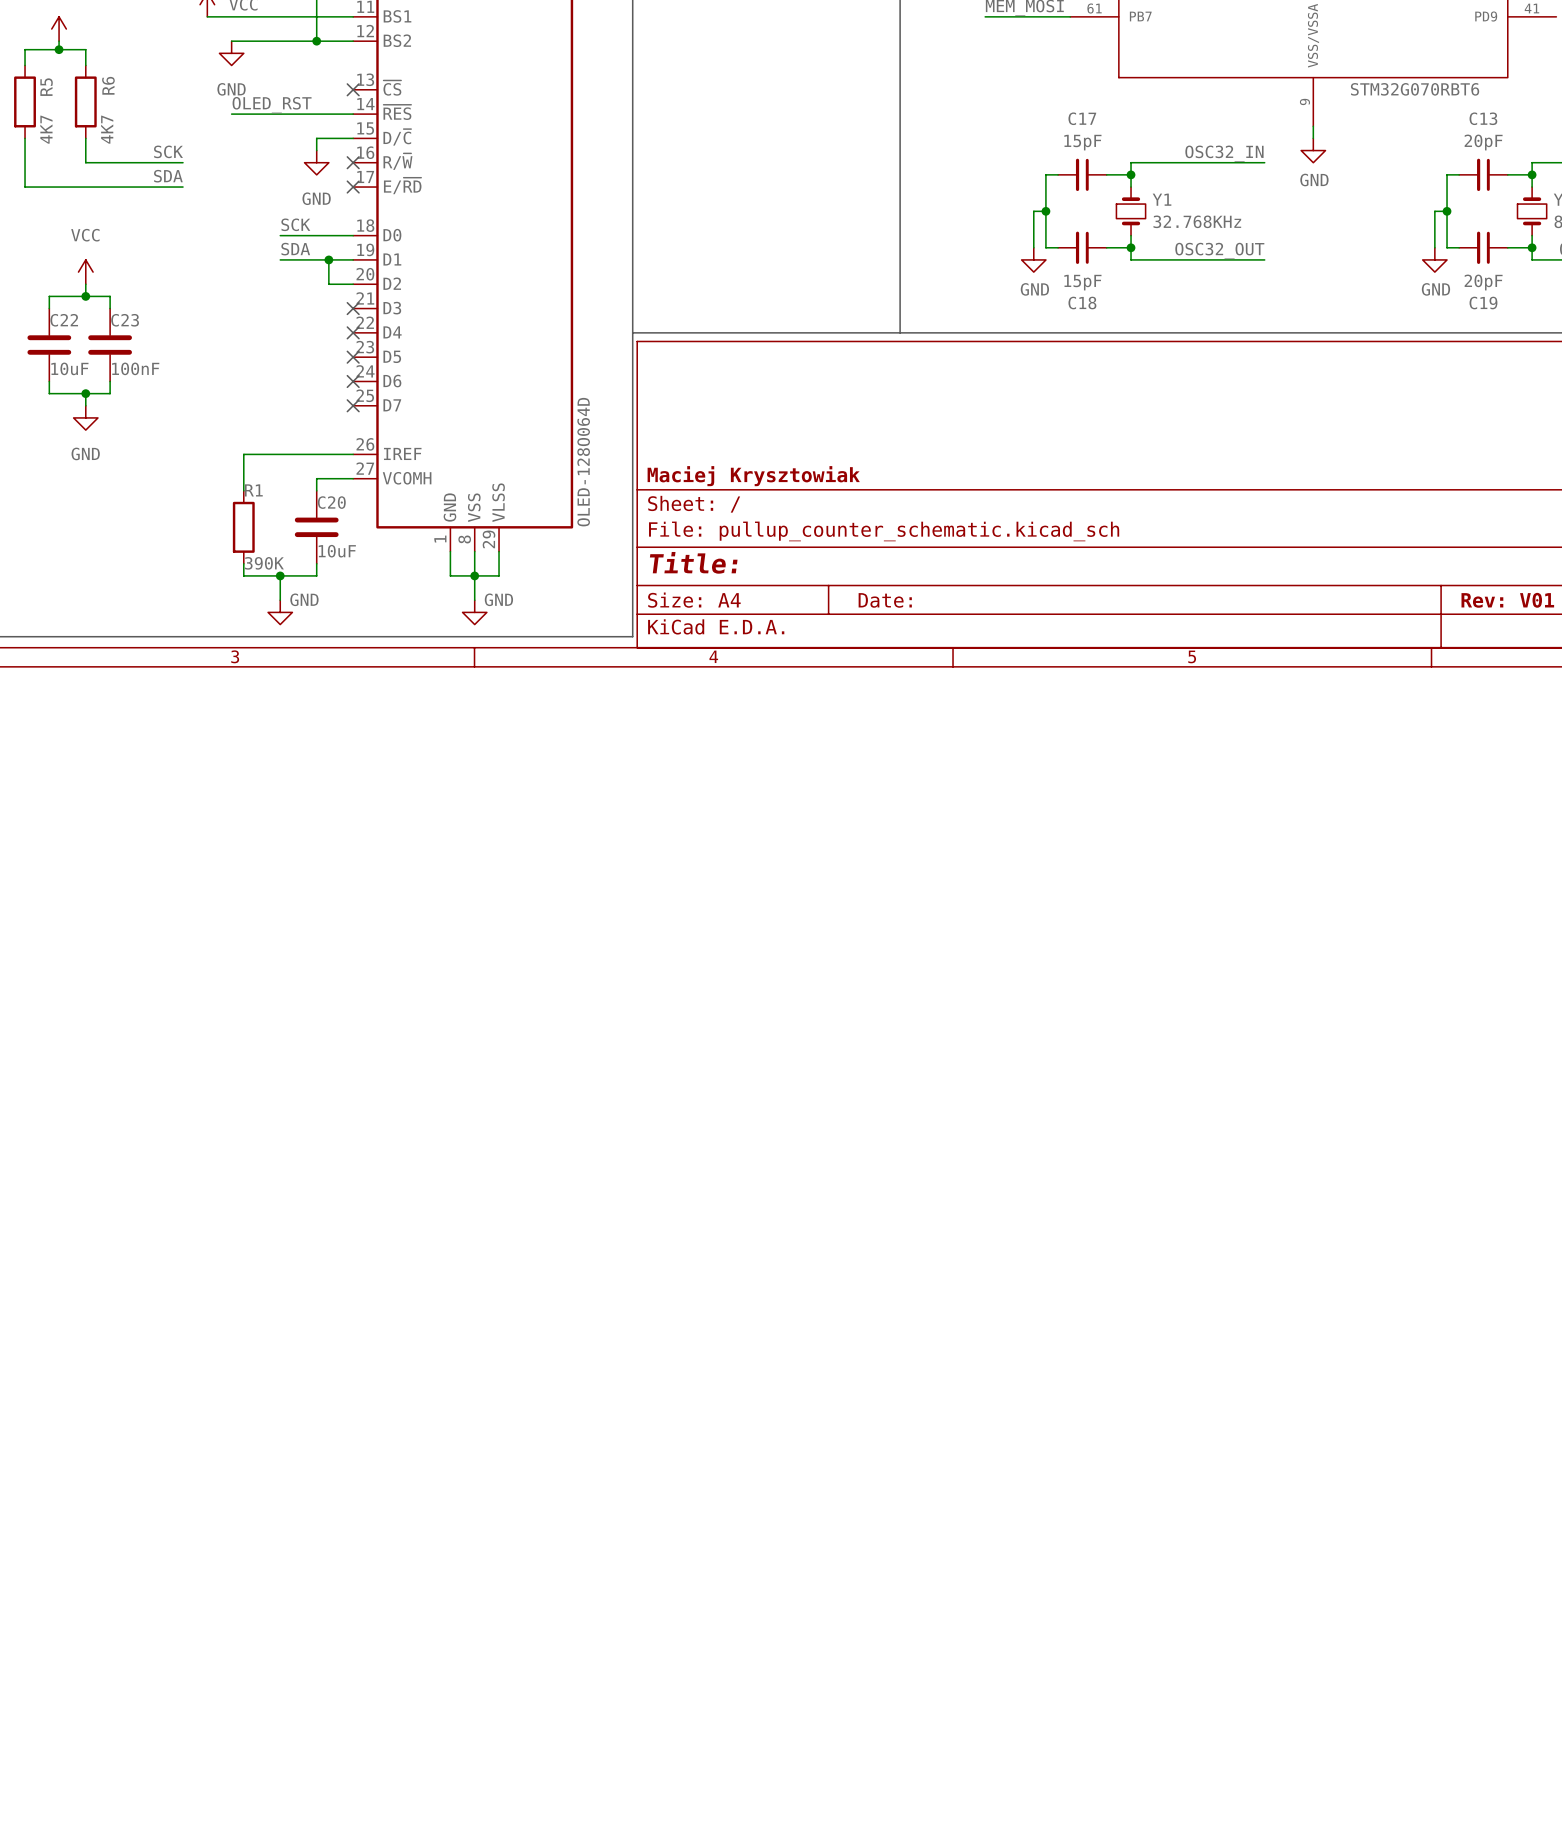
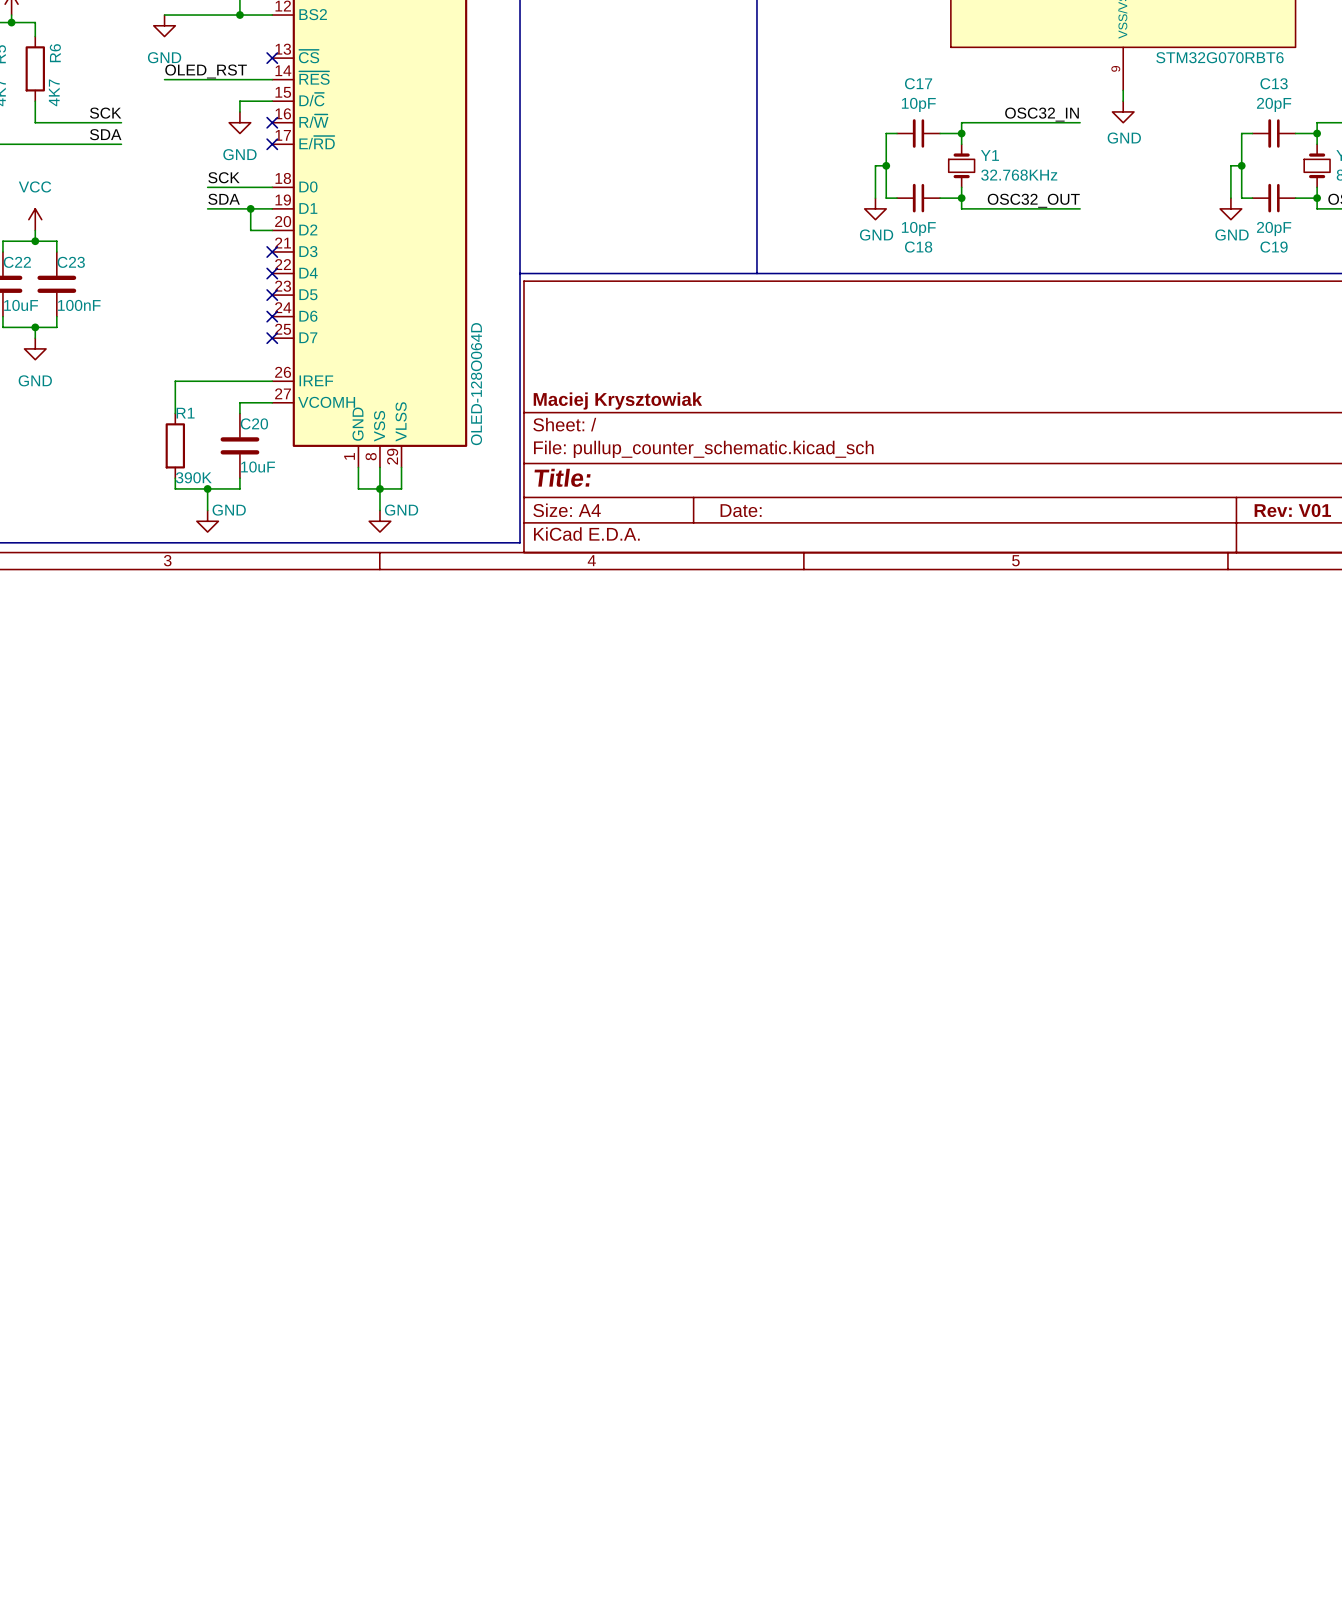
C17 value: 15pF (1082, 142) -> 10pF (918, 104)
C18 value: 15pF (1082, 282) -> 10pF (918, 229)

